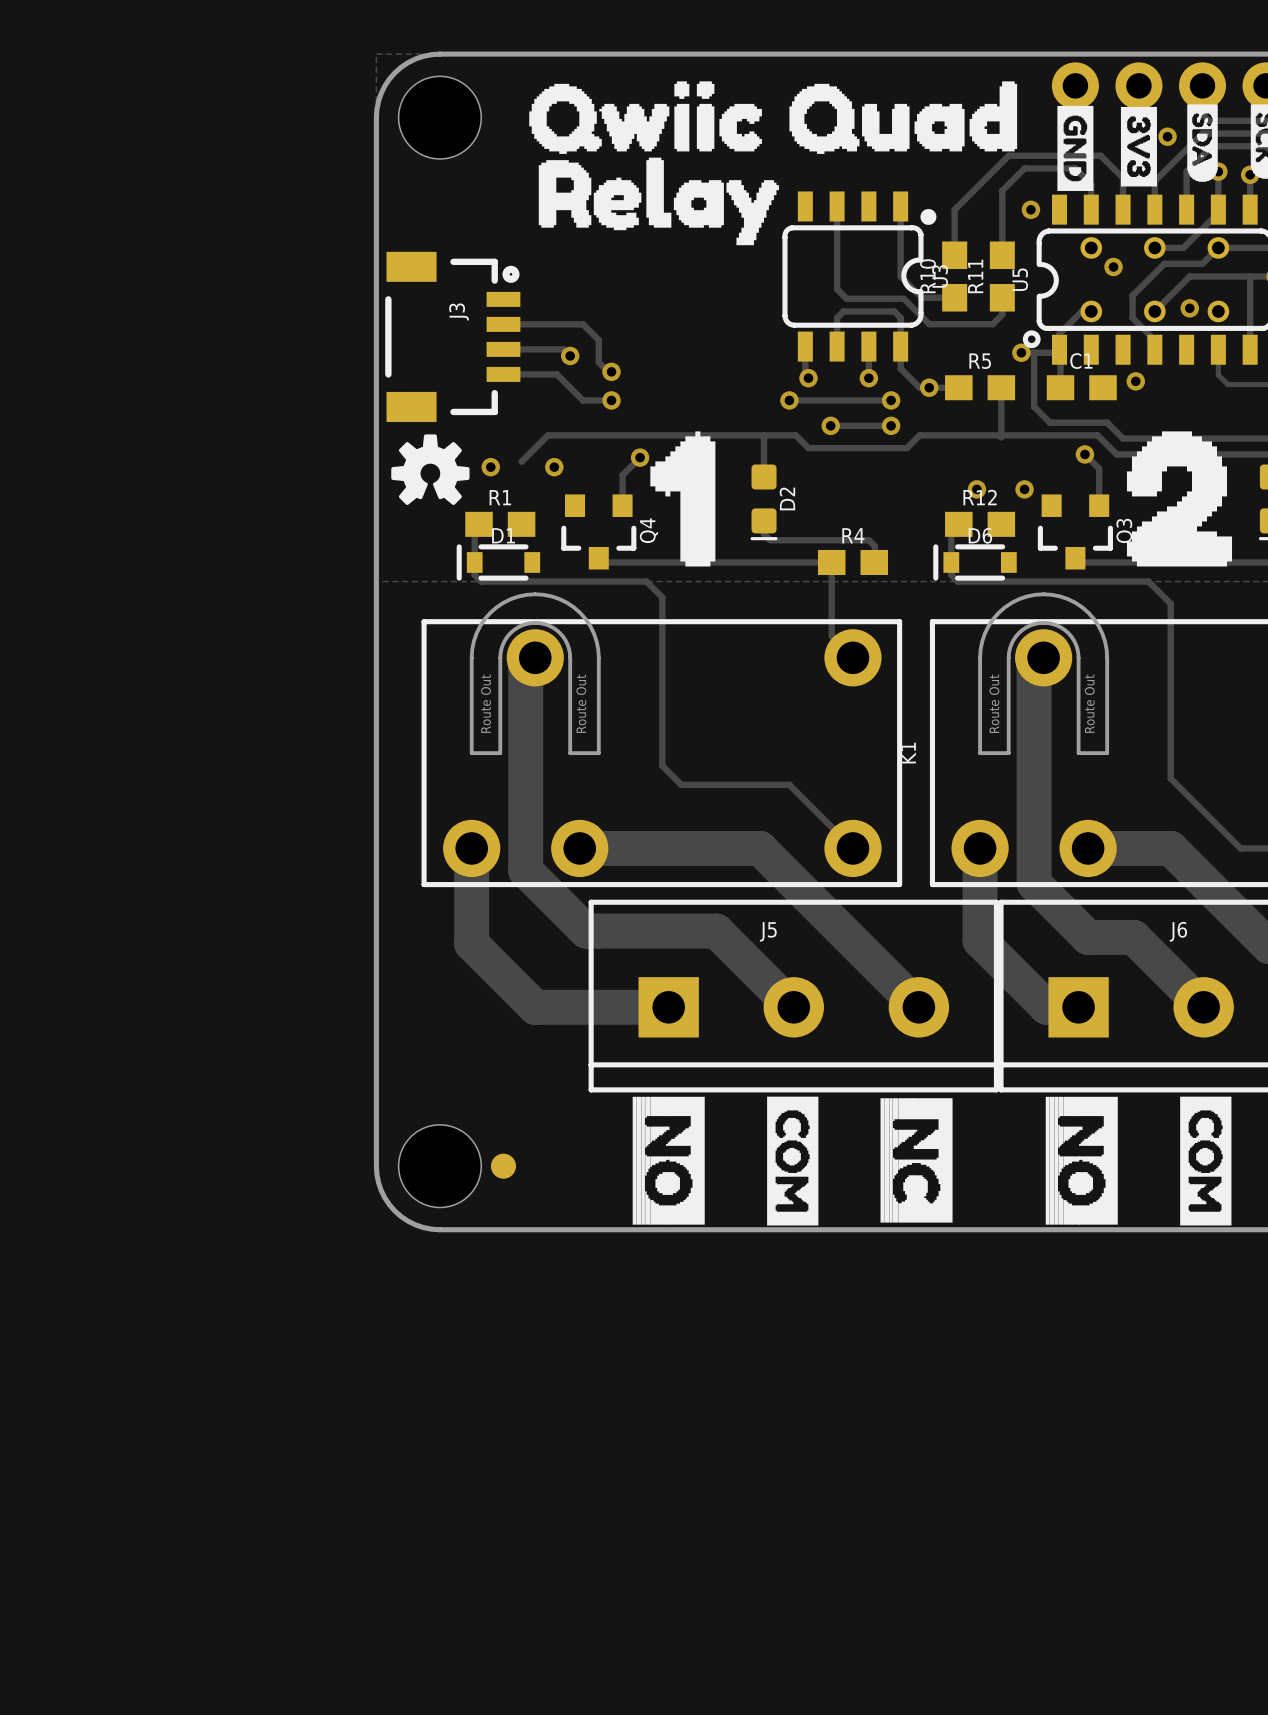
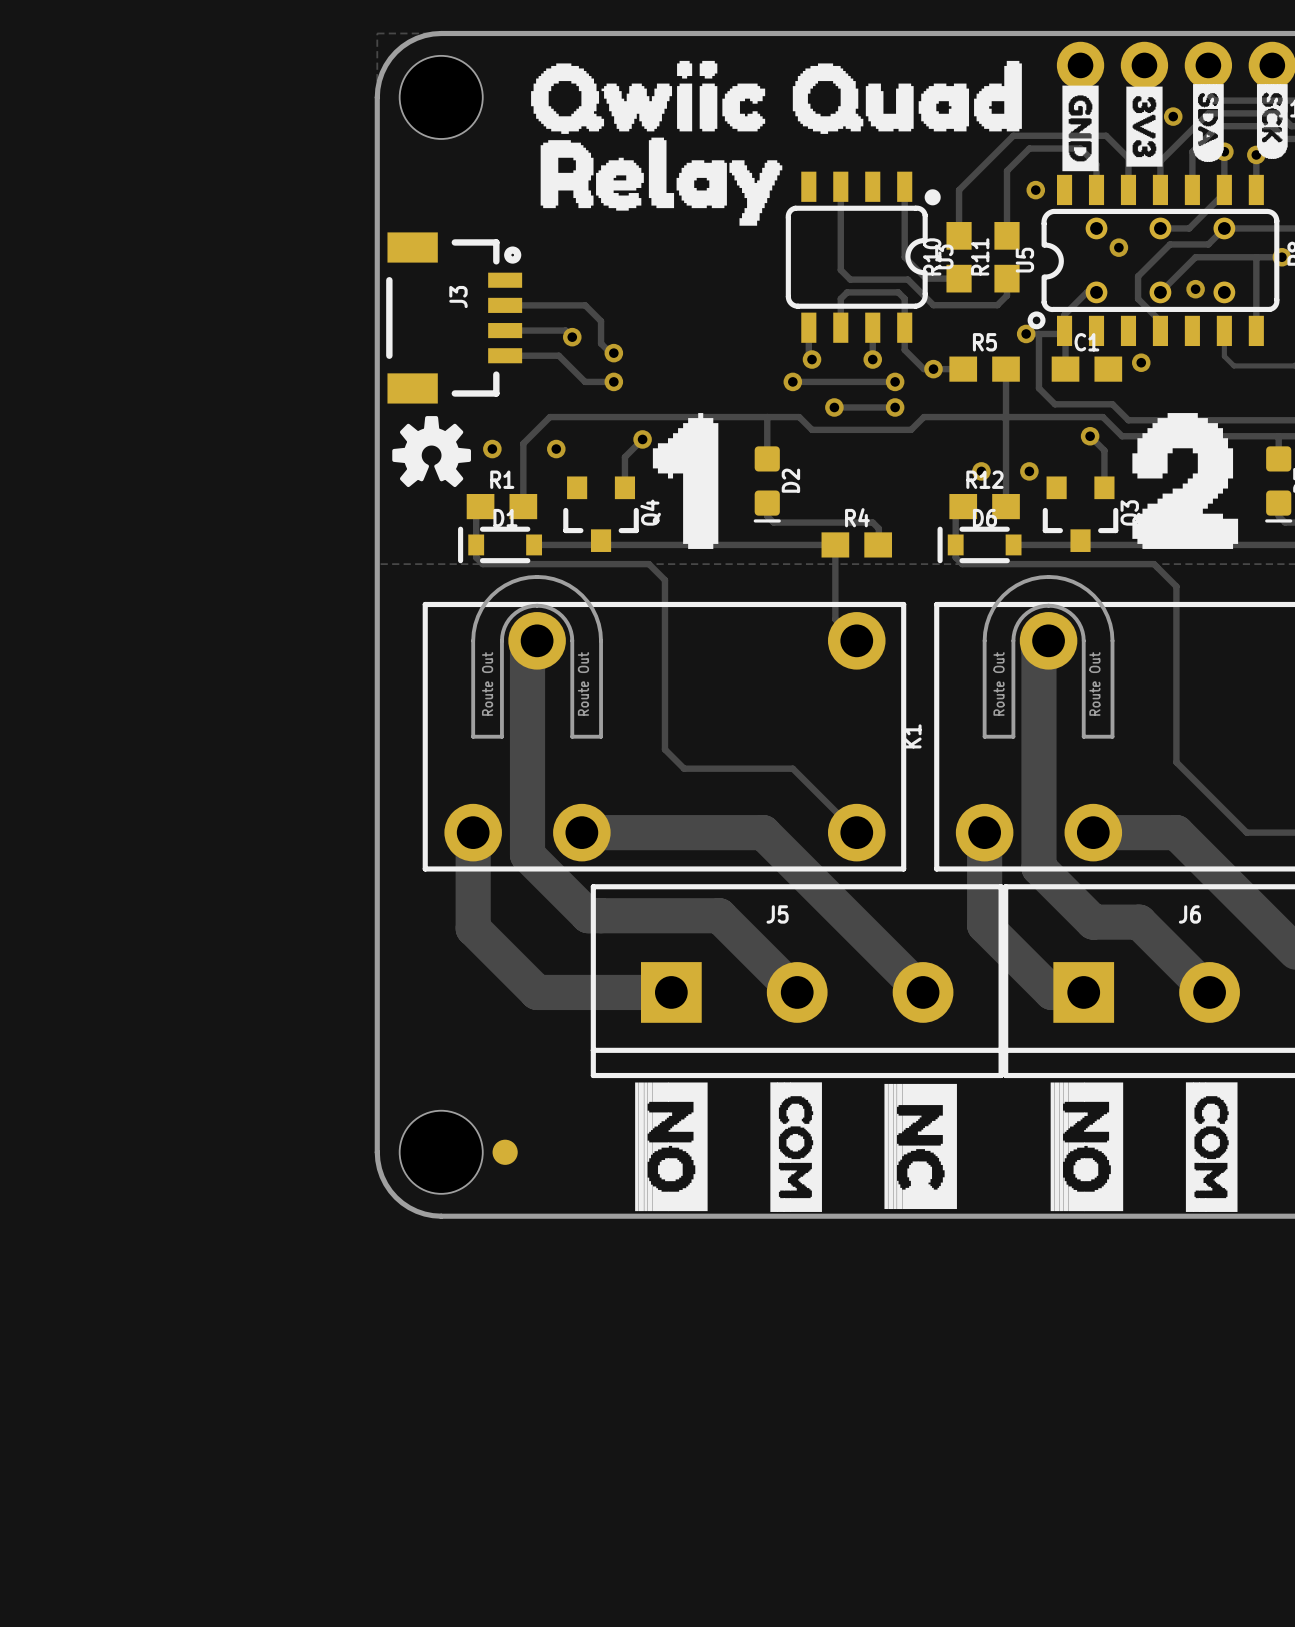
track: none -> (1006, 419) (1006, 506)
track: none -> (523, 443) (523, 506)
track: none -> (534, 544) (596, 544)
track: none -> (1013, 544) (1076, 544)

